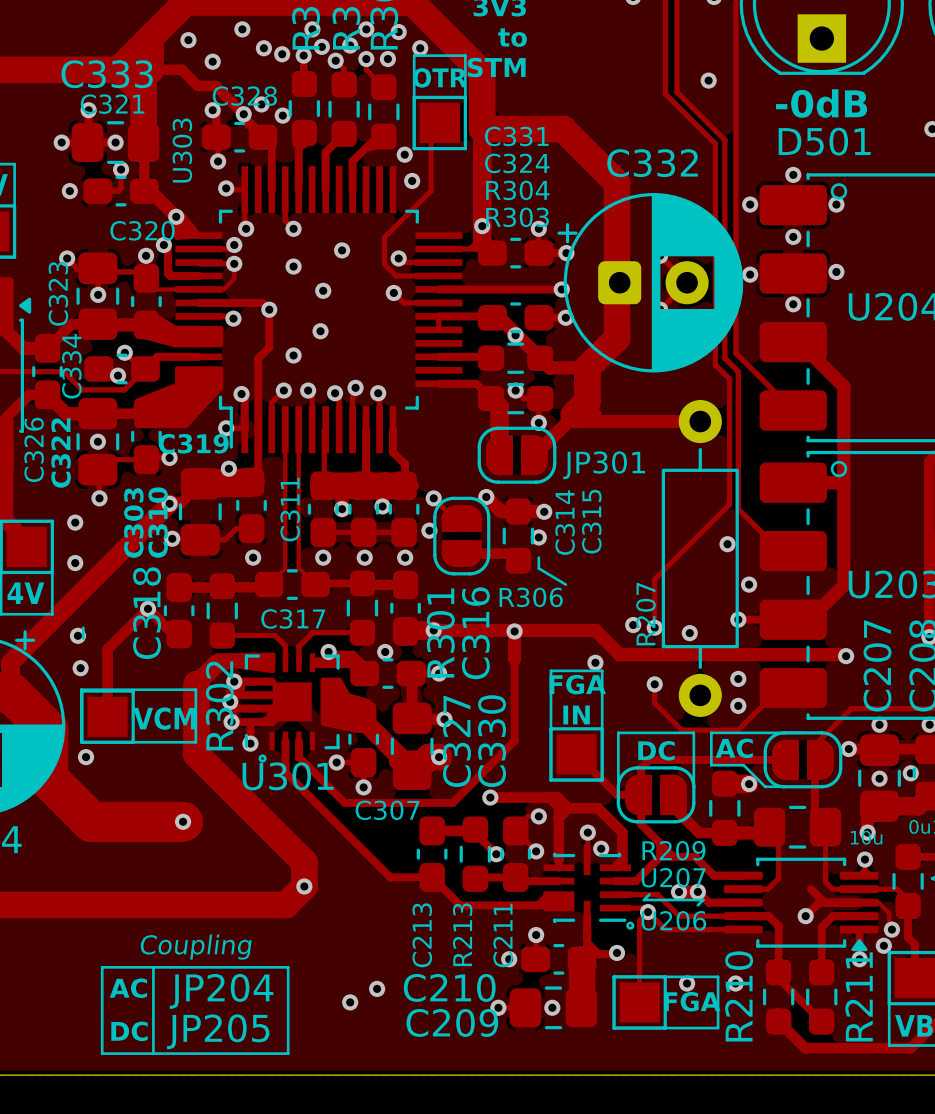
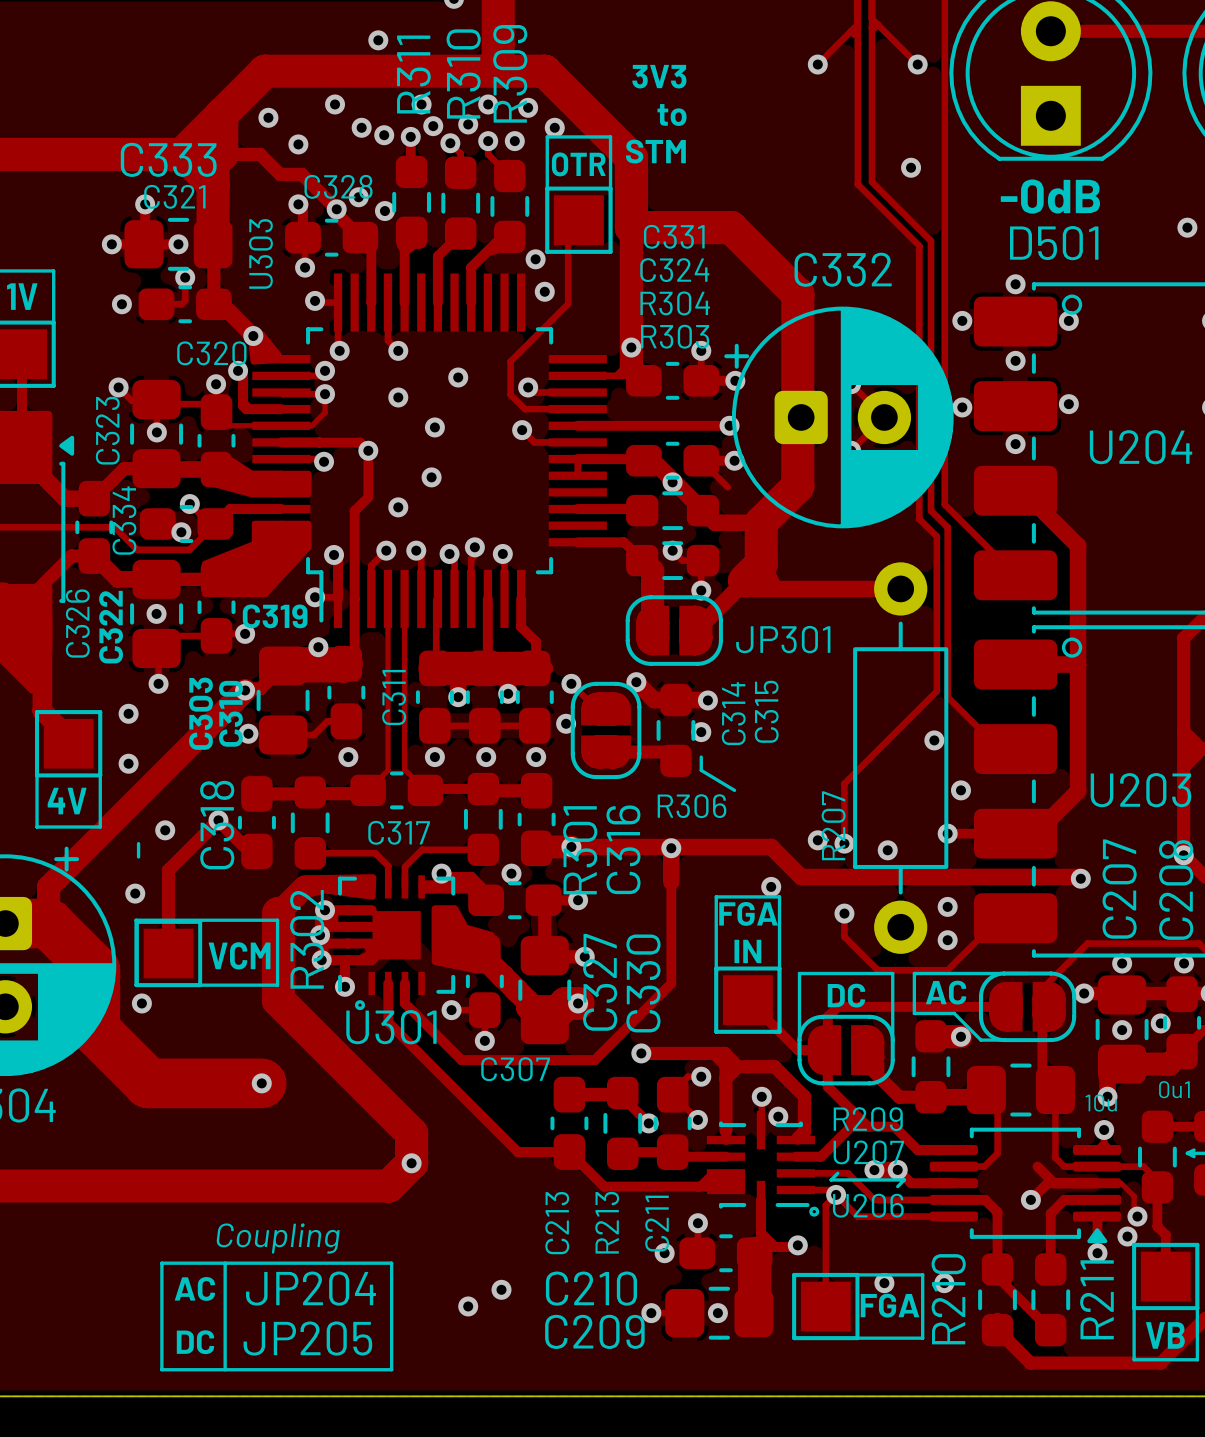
track: none -> (701, 460) (727, 487)
via position: (77, 635) -> (165, 830)

